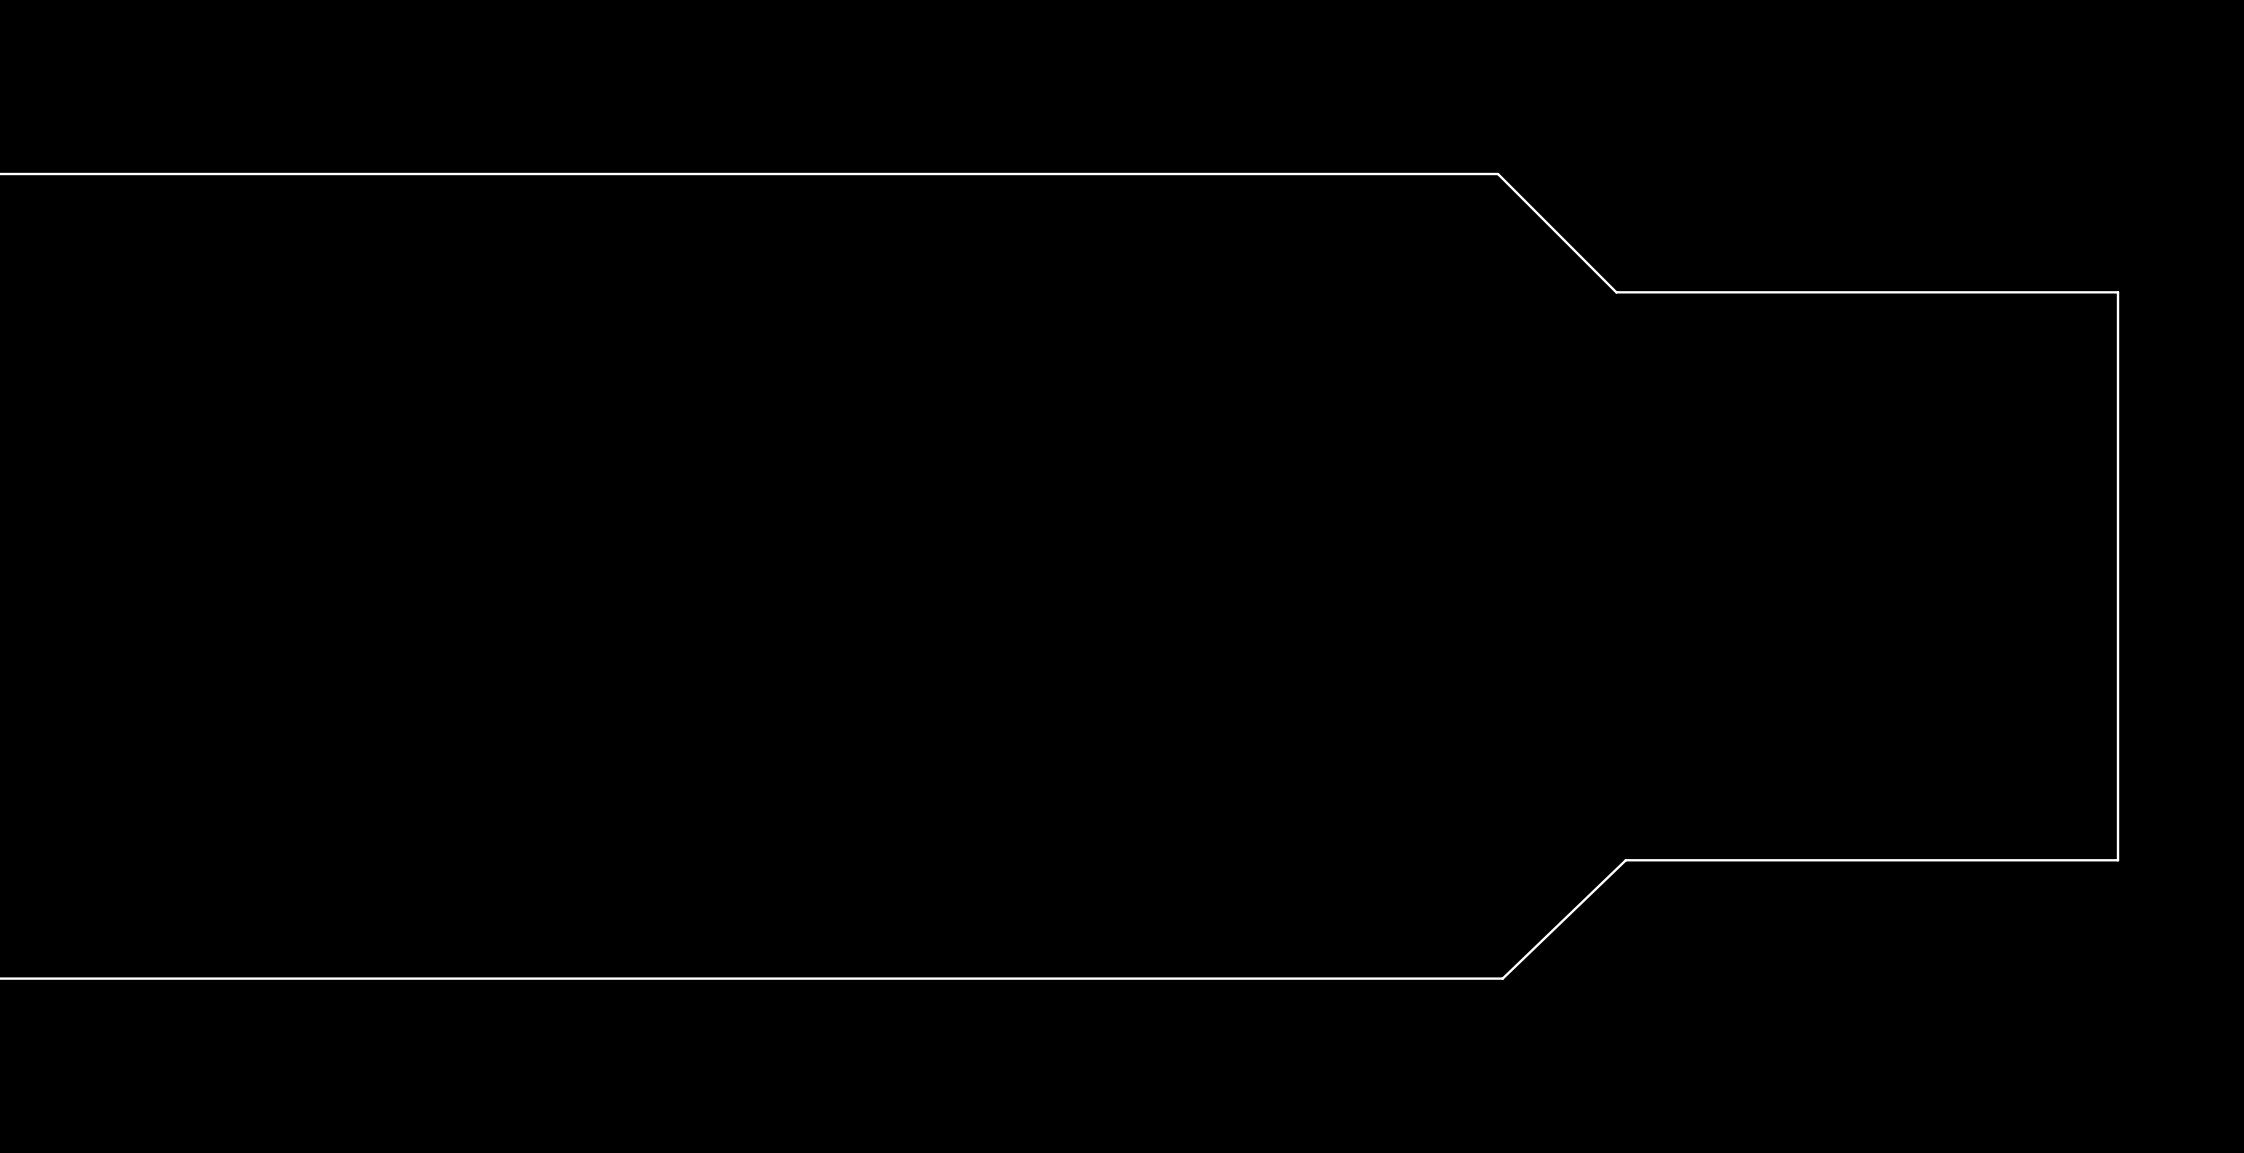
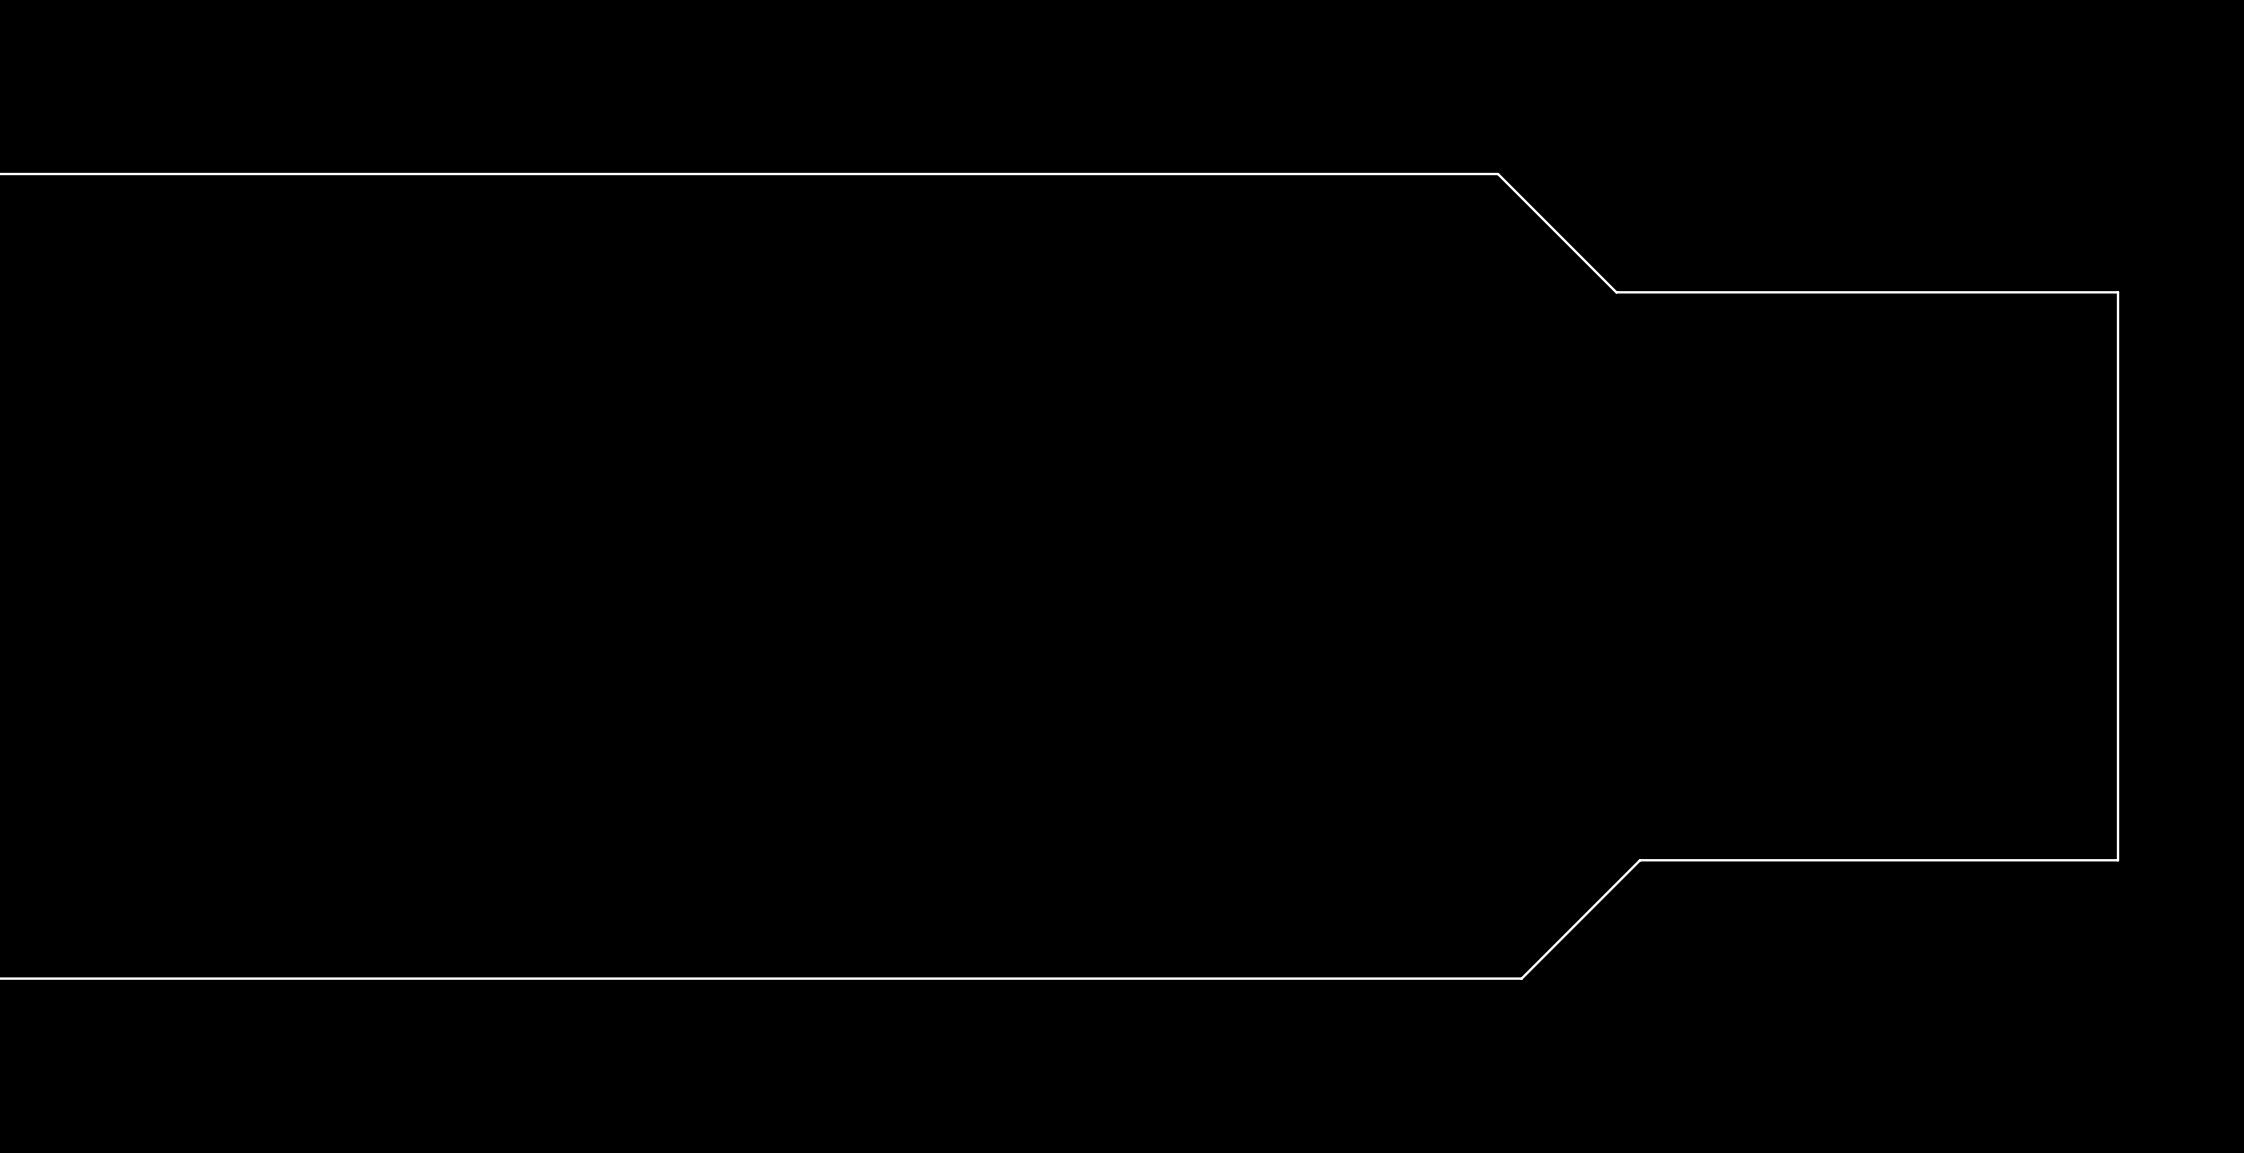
board edge: (1640, 860) (1625, 860) (1502, 978) -> (1640, 860) (1521, 978) (1502, 978)

